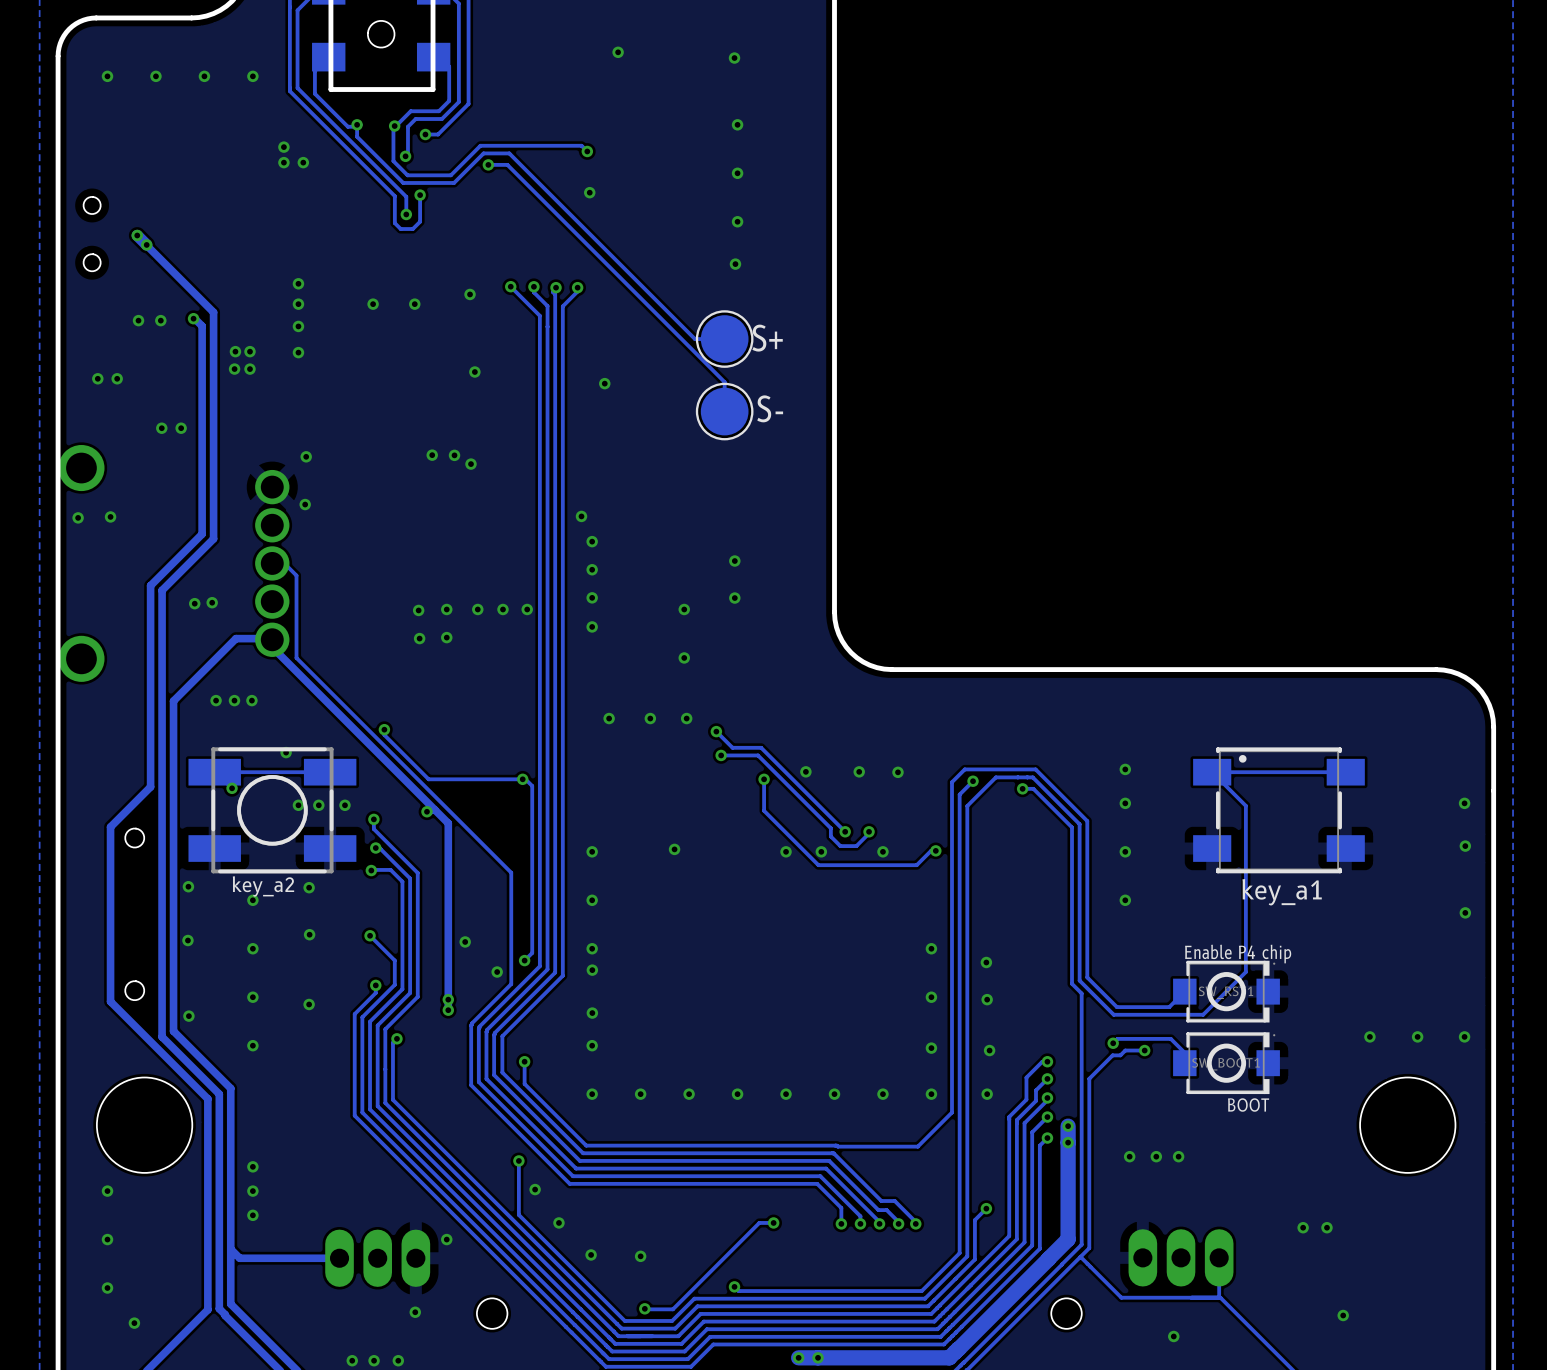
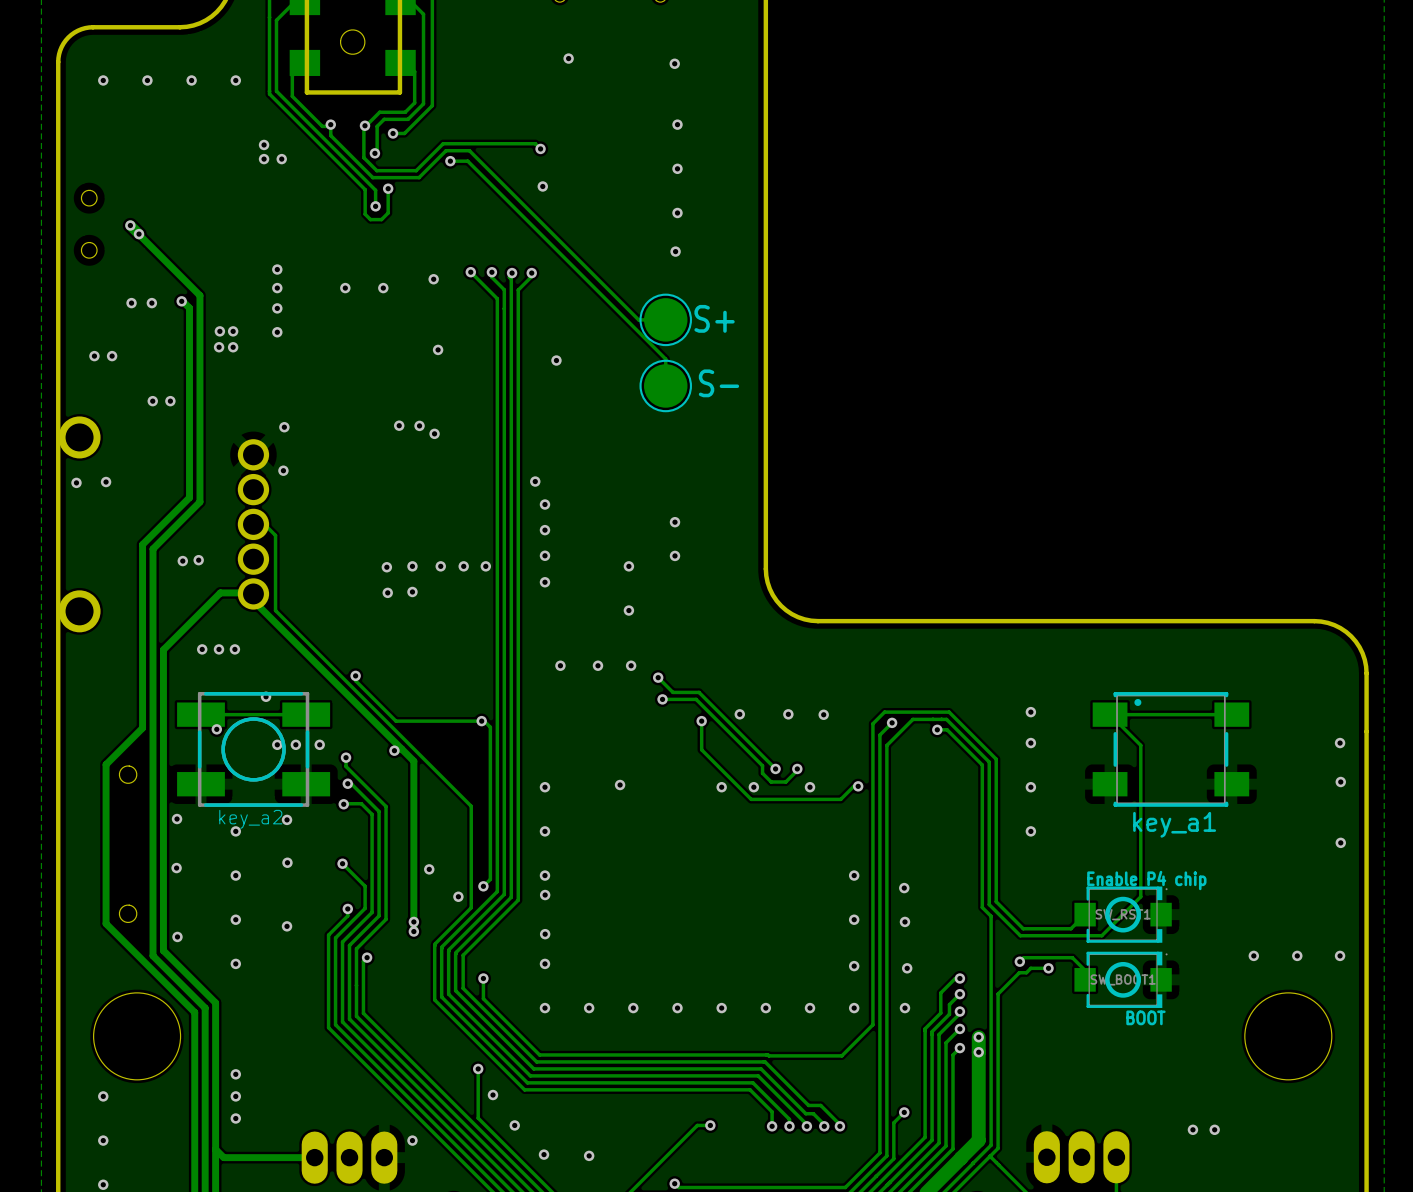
via: (1129, 1156) -> none
via: (1156, 1156) -> none
via: (1178, 1156) -> none

